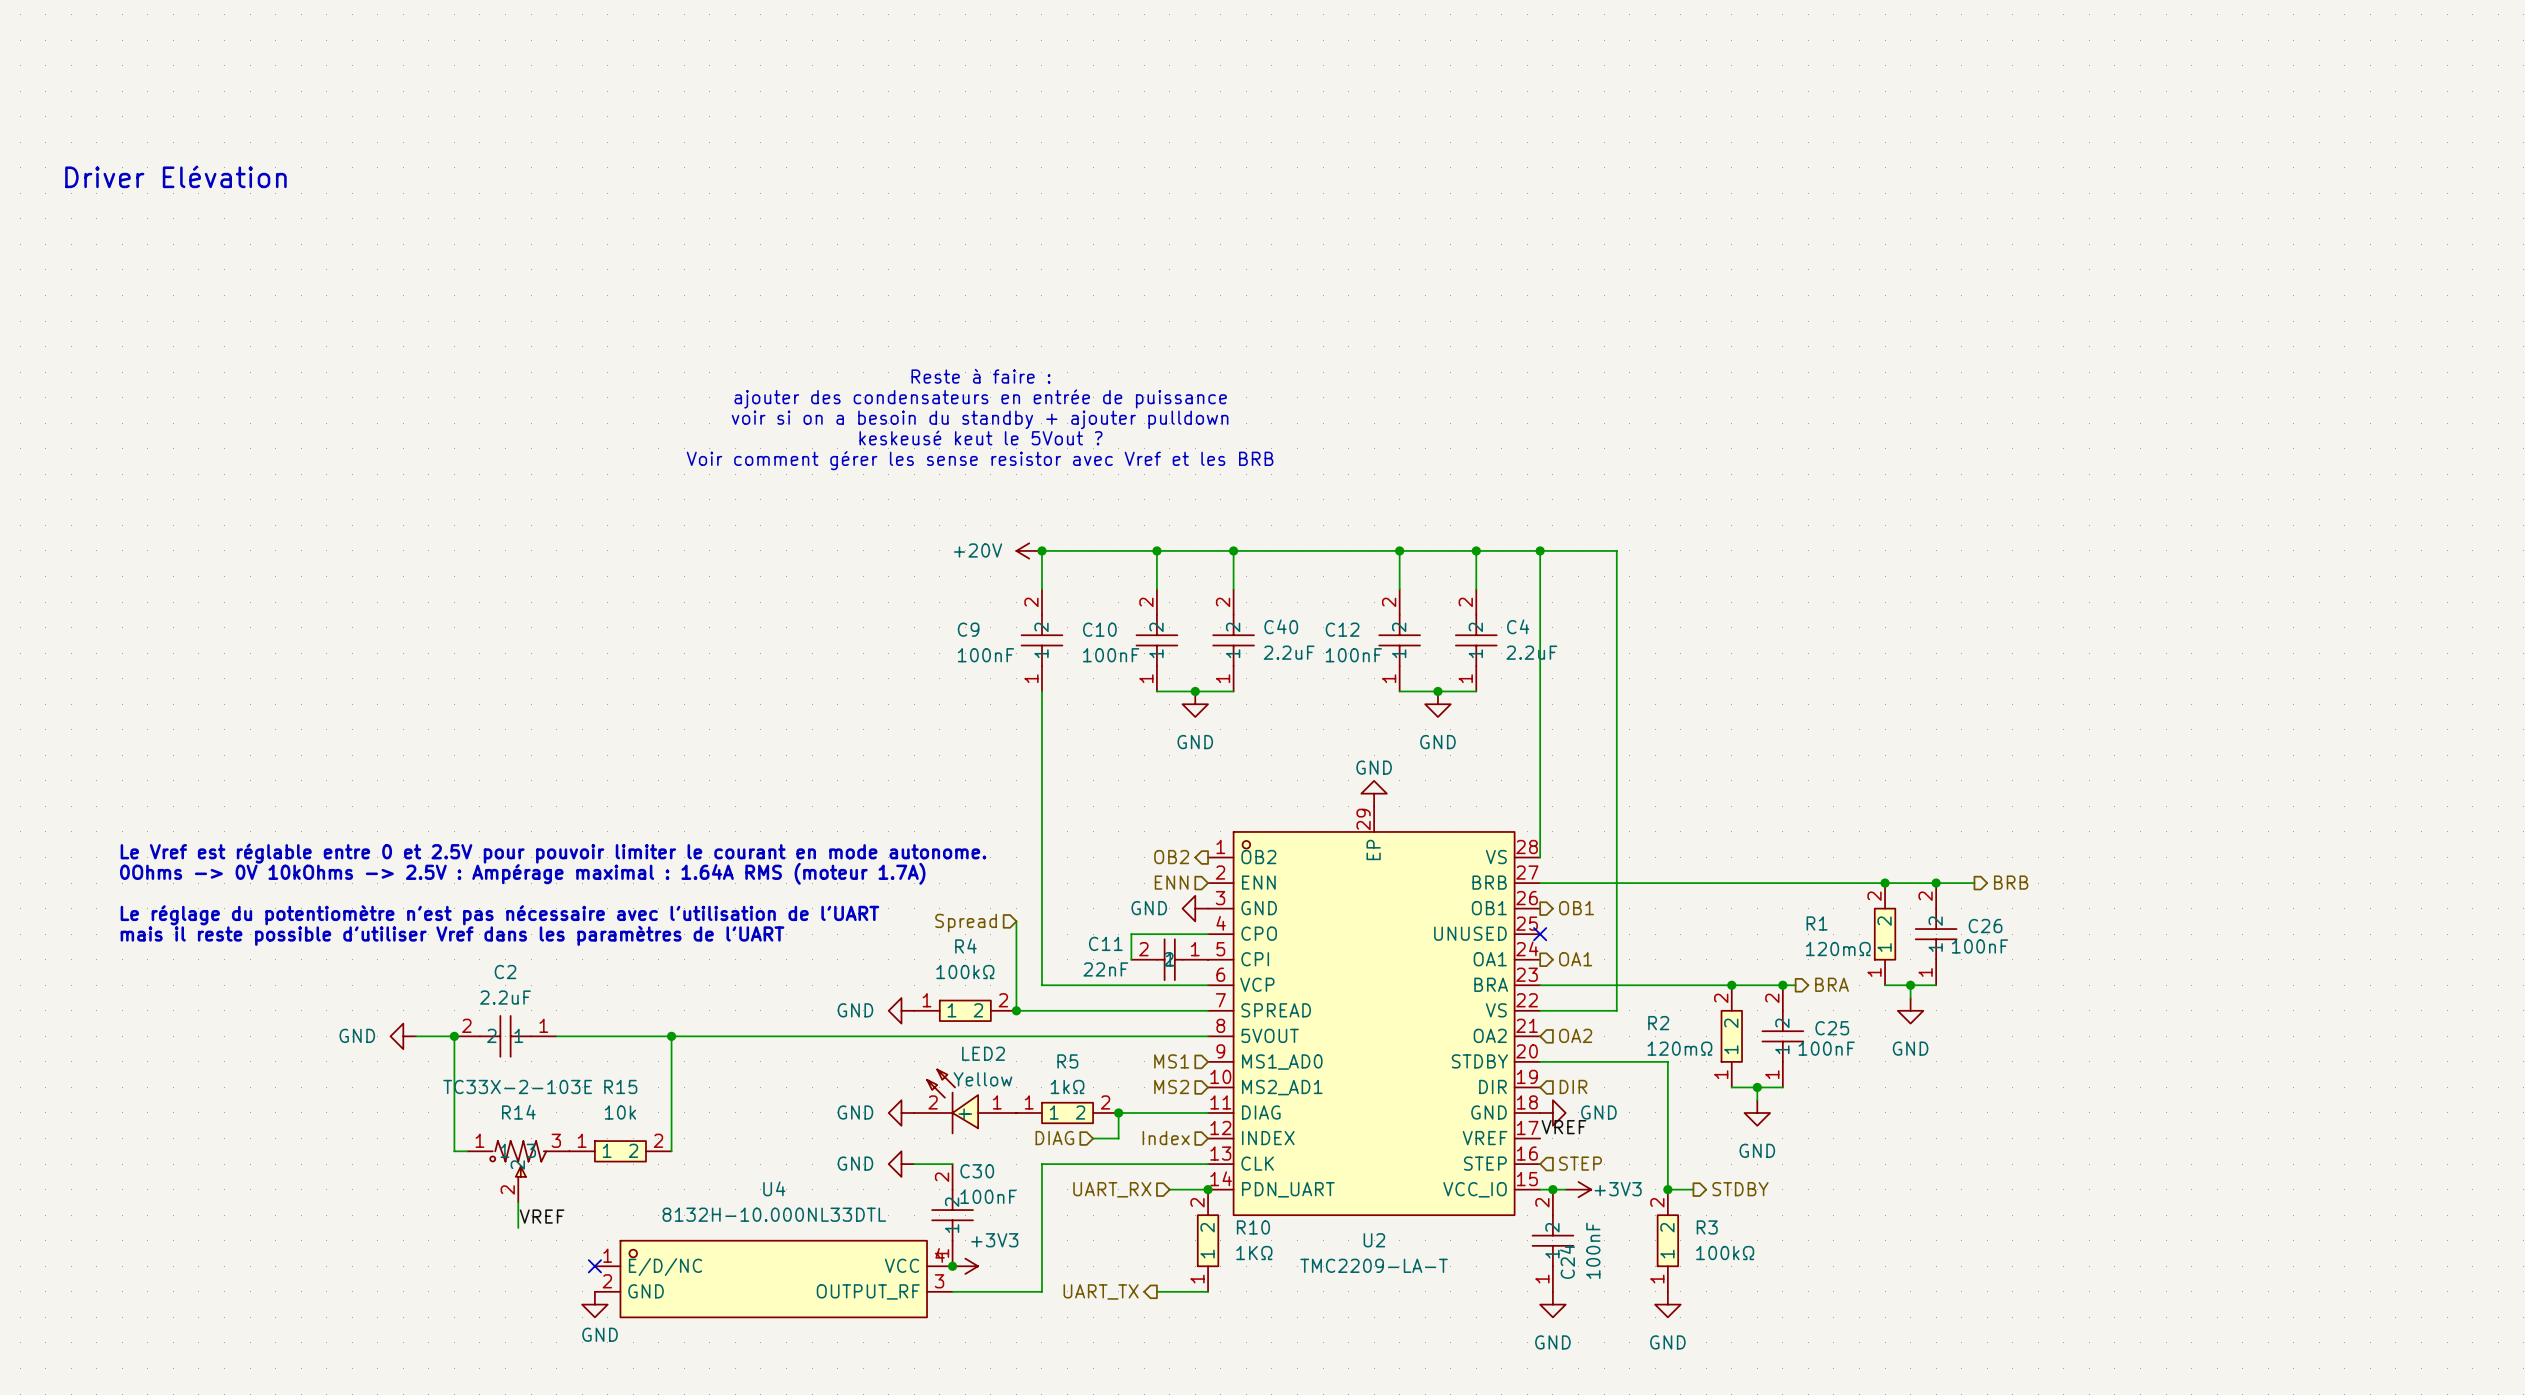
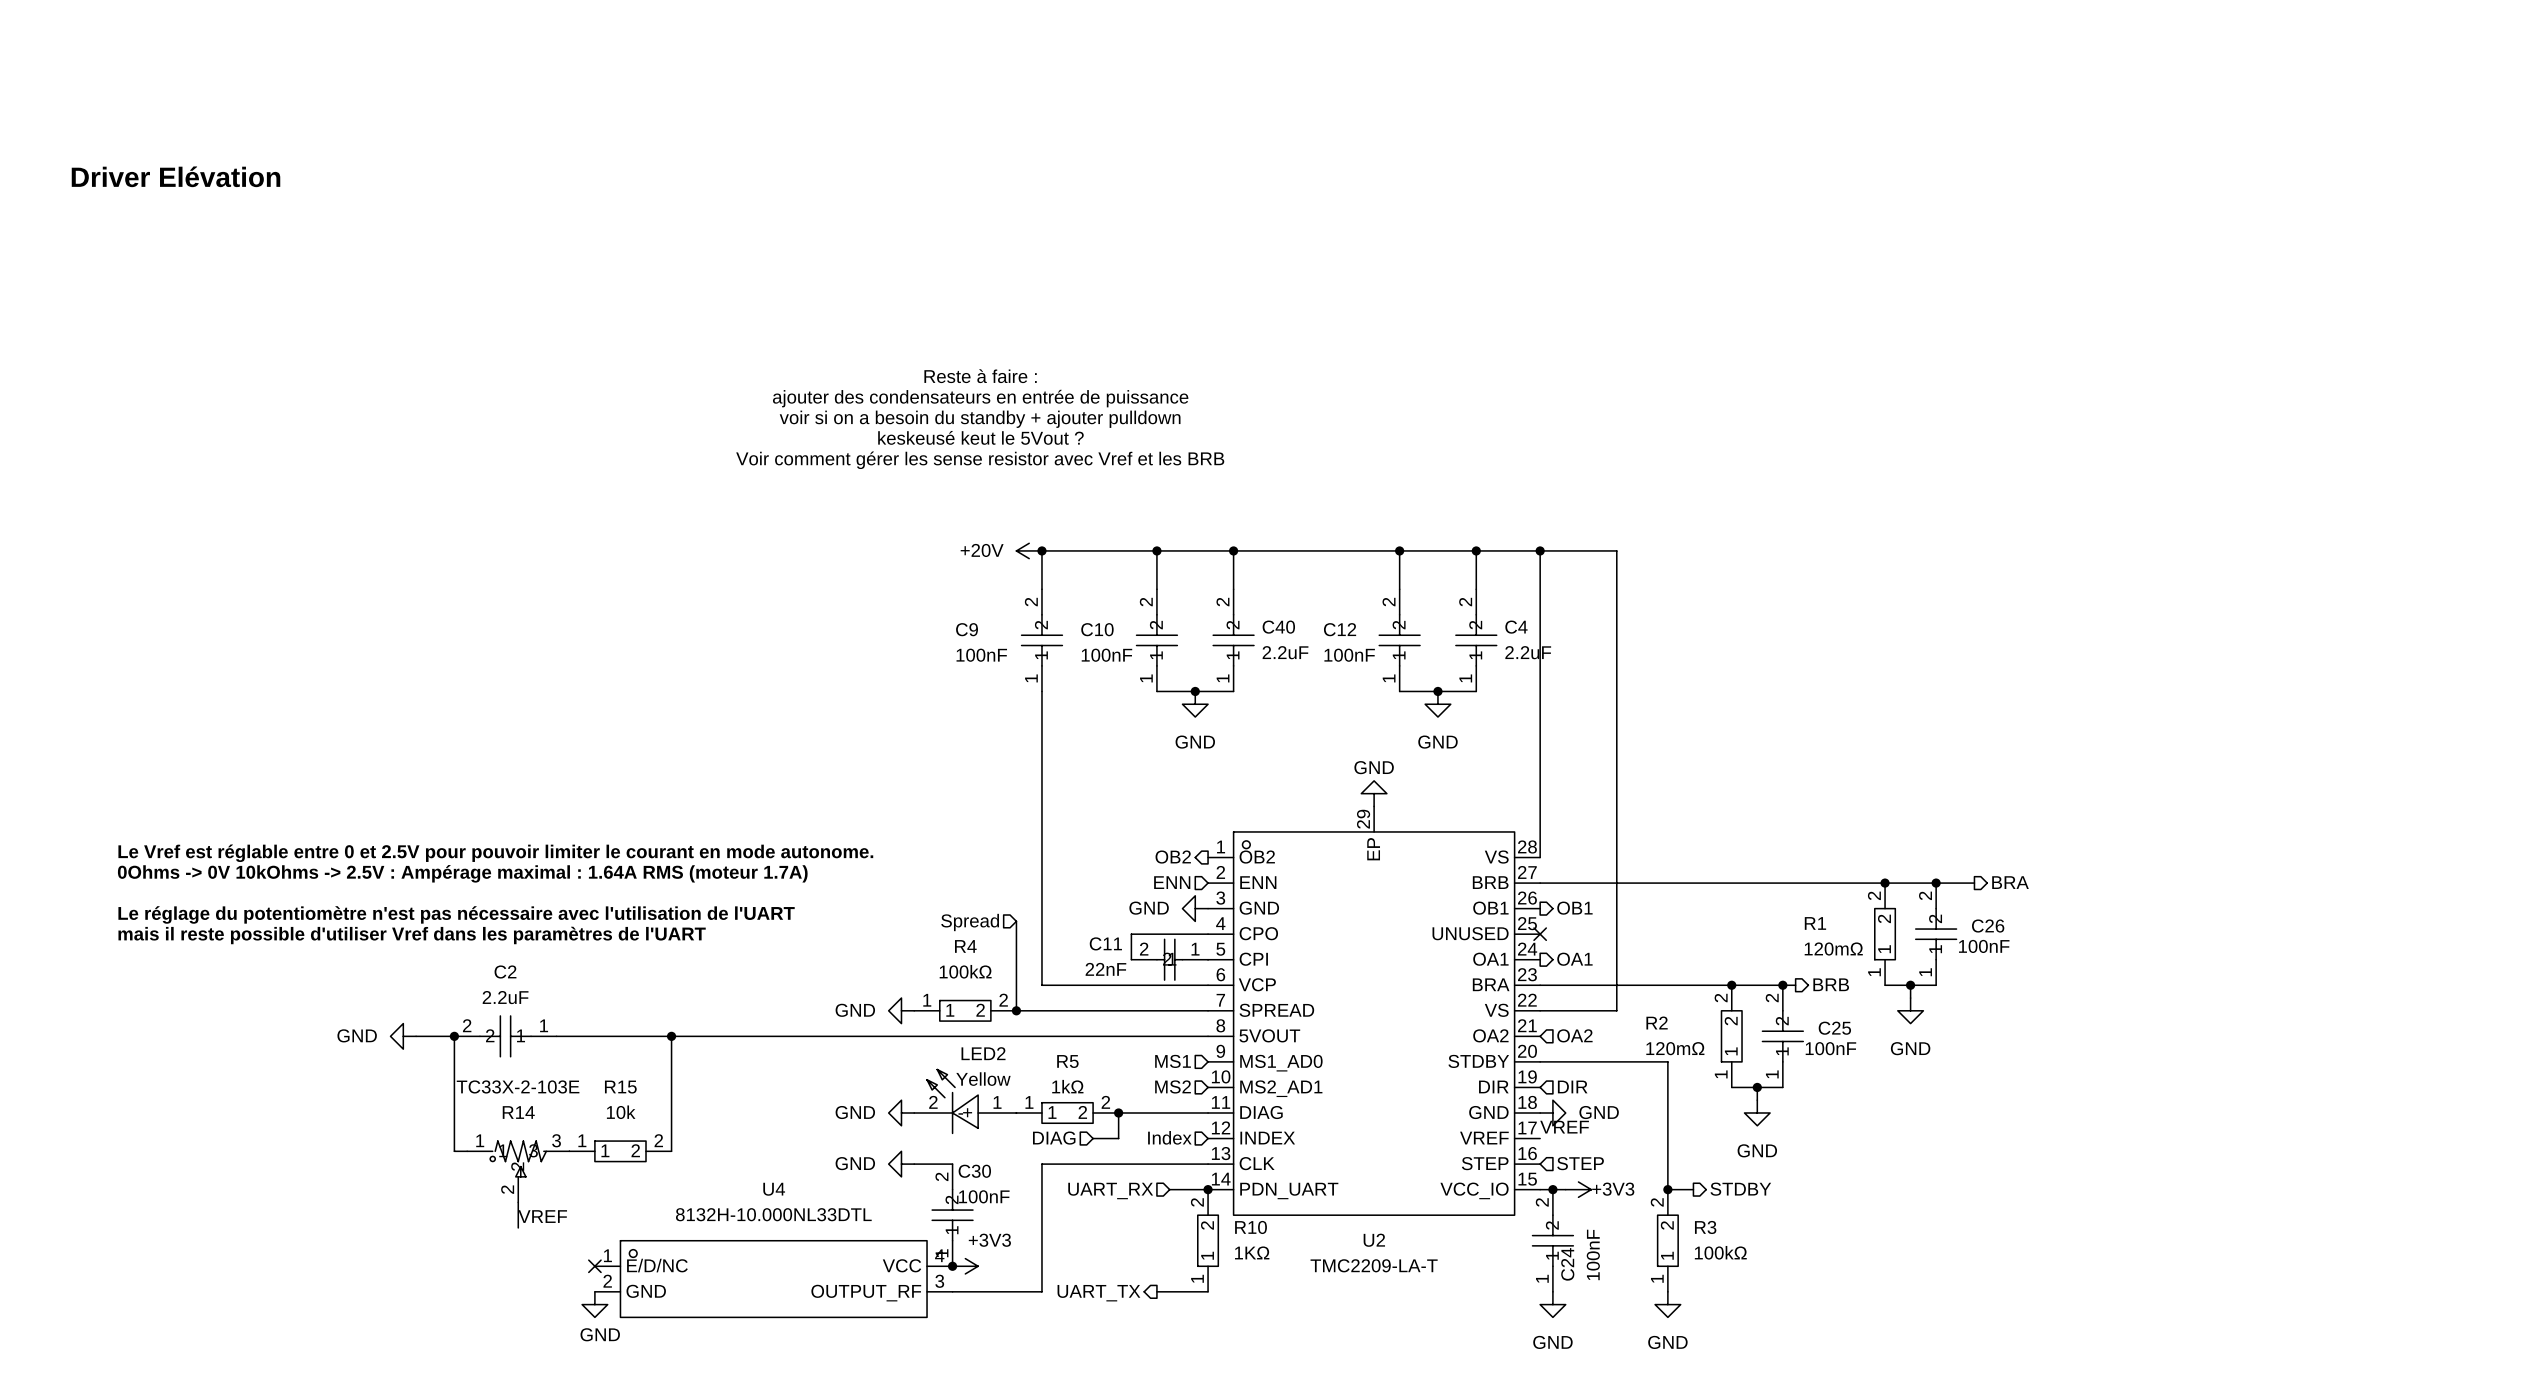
hierarchical label: BRB (2011, 882) -> BRA (2010, 882)
hierarchical label: BRA (1832, 984) -> BRB (1831, 984)

